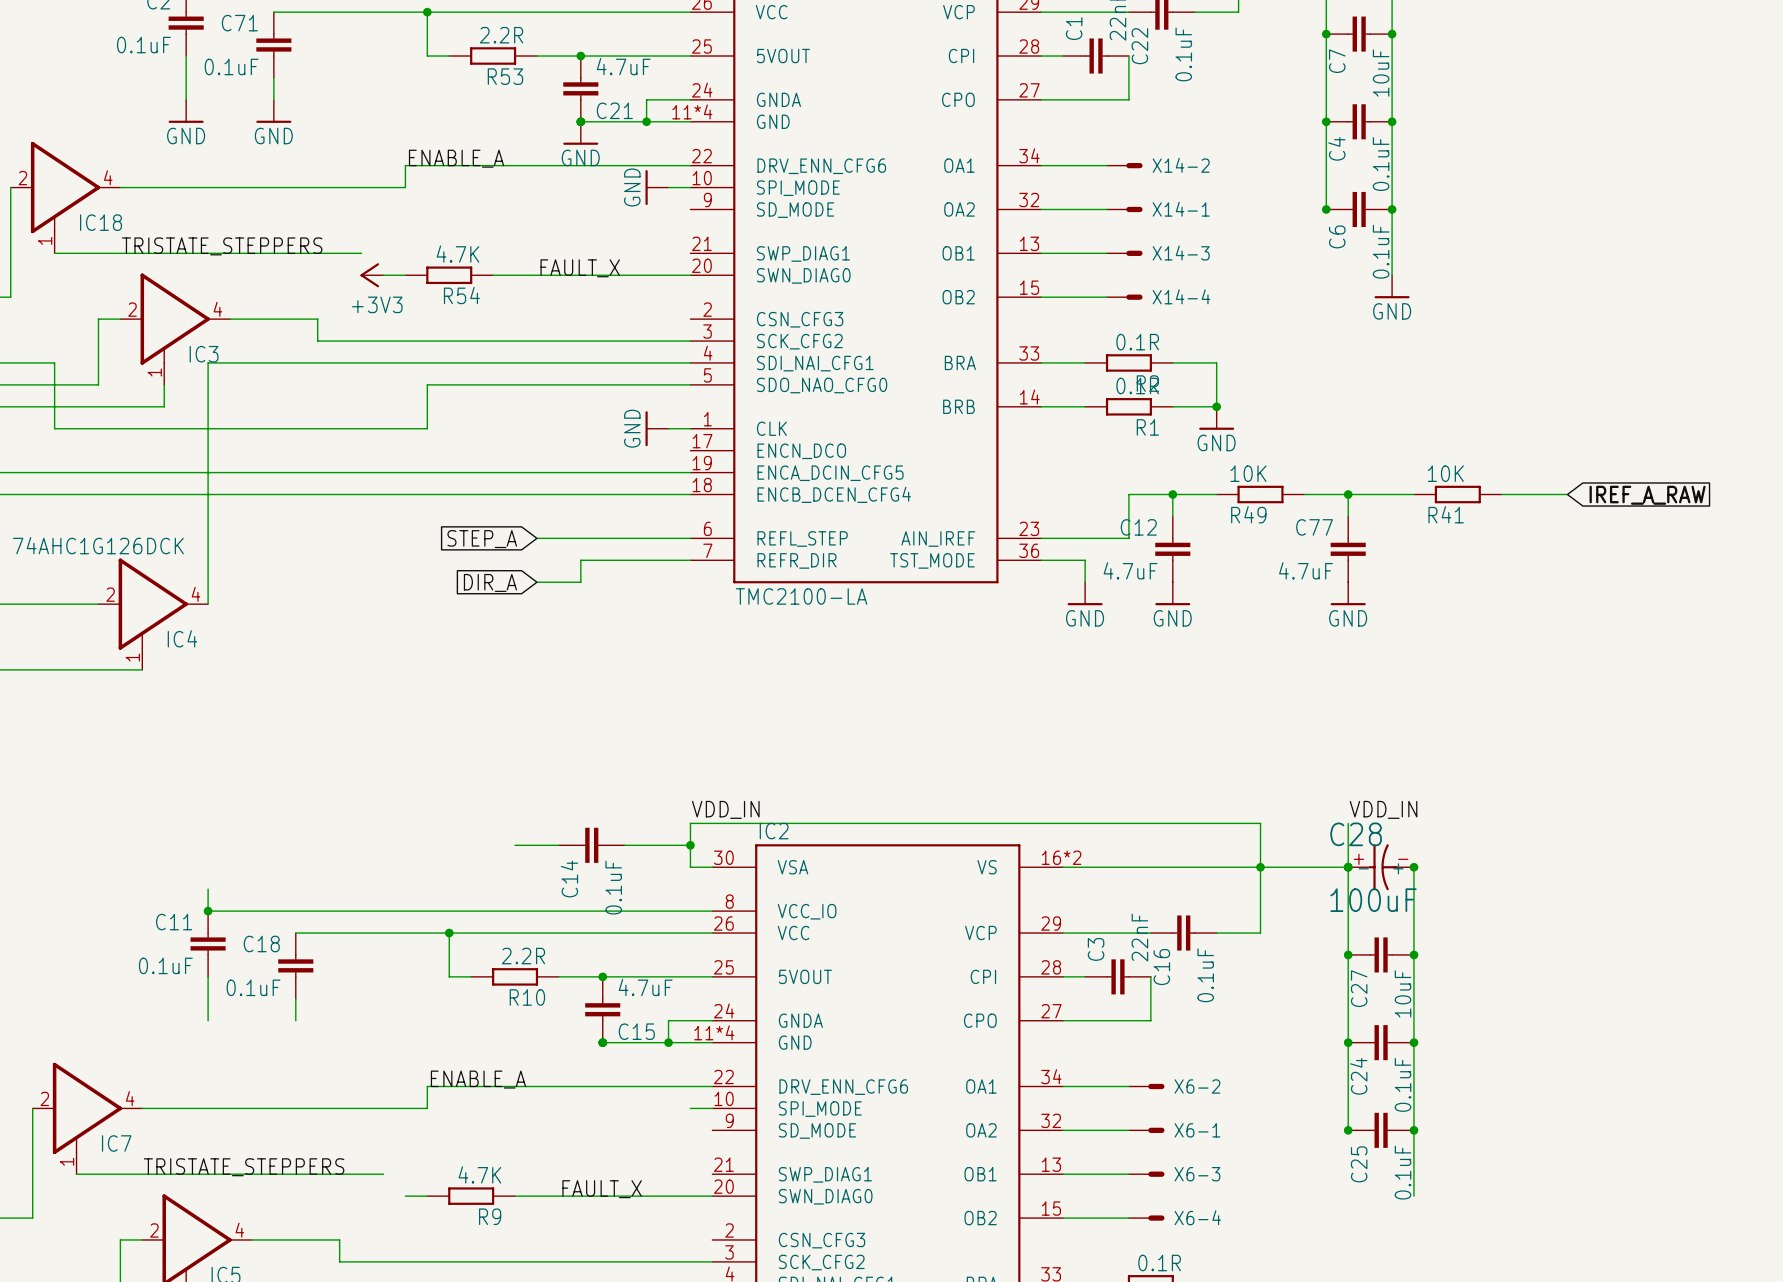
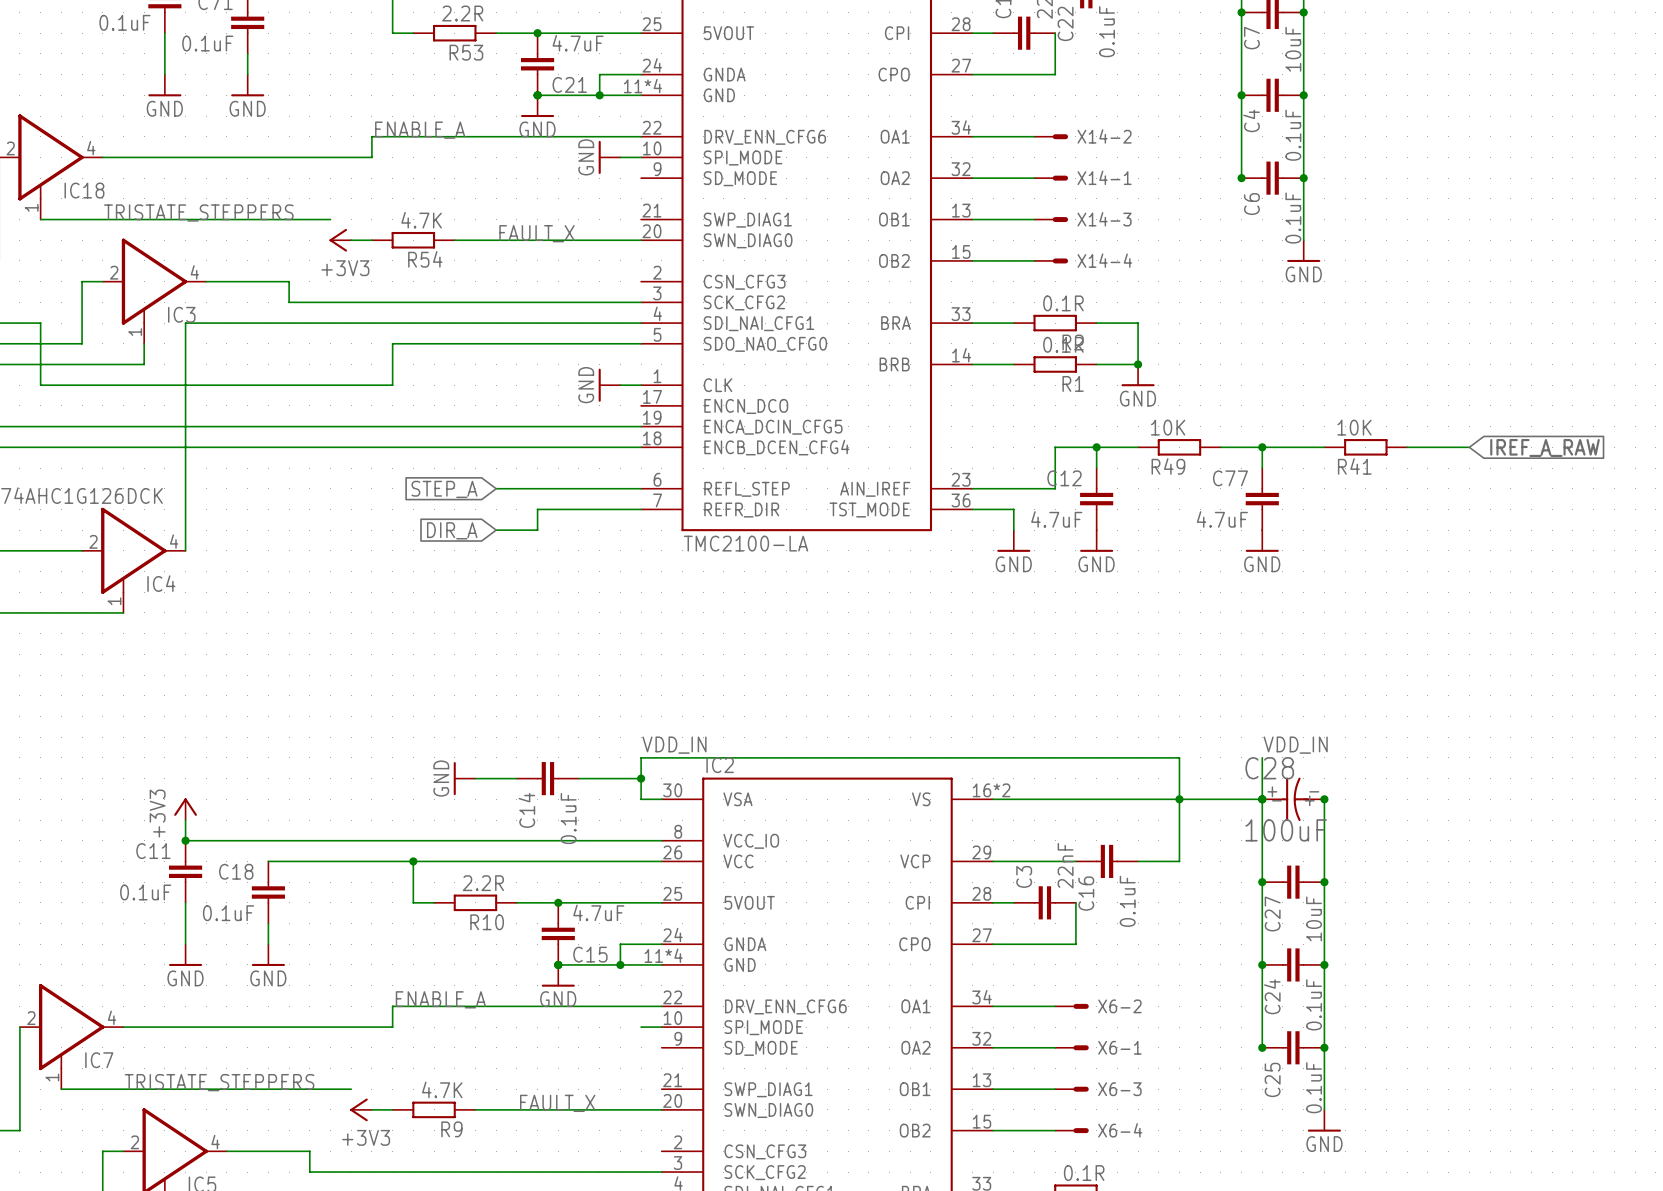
power symbol: none -> GND (464, 778)
power symbol: none -> +3V3 (185, 809)
power symbol: none -> GND (185, 955)
power symbol: none -> GND (268, 955)
power symbol: none -> GND (558, 975)
power symbol: none -> +3V3 (361, 1109)
power symbol: none -> GND (1324, 1120)

